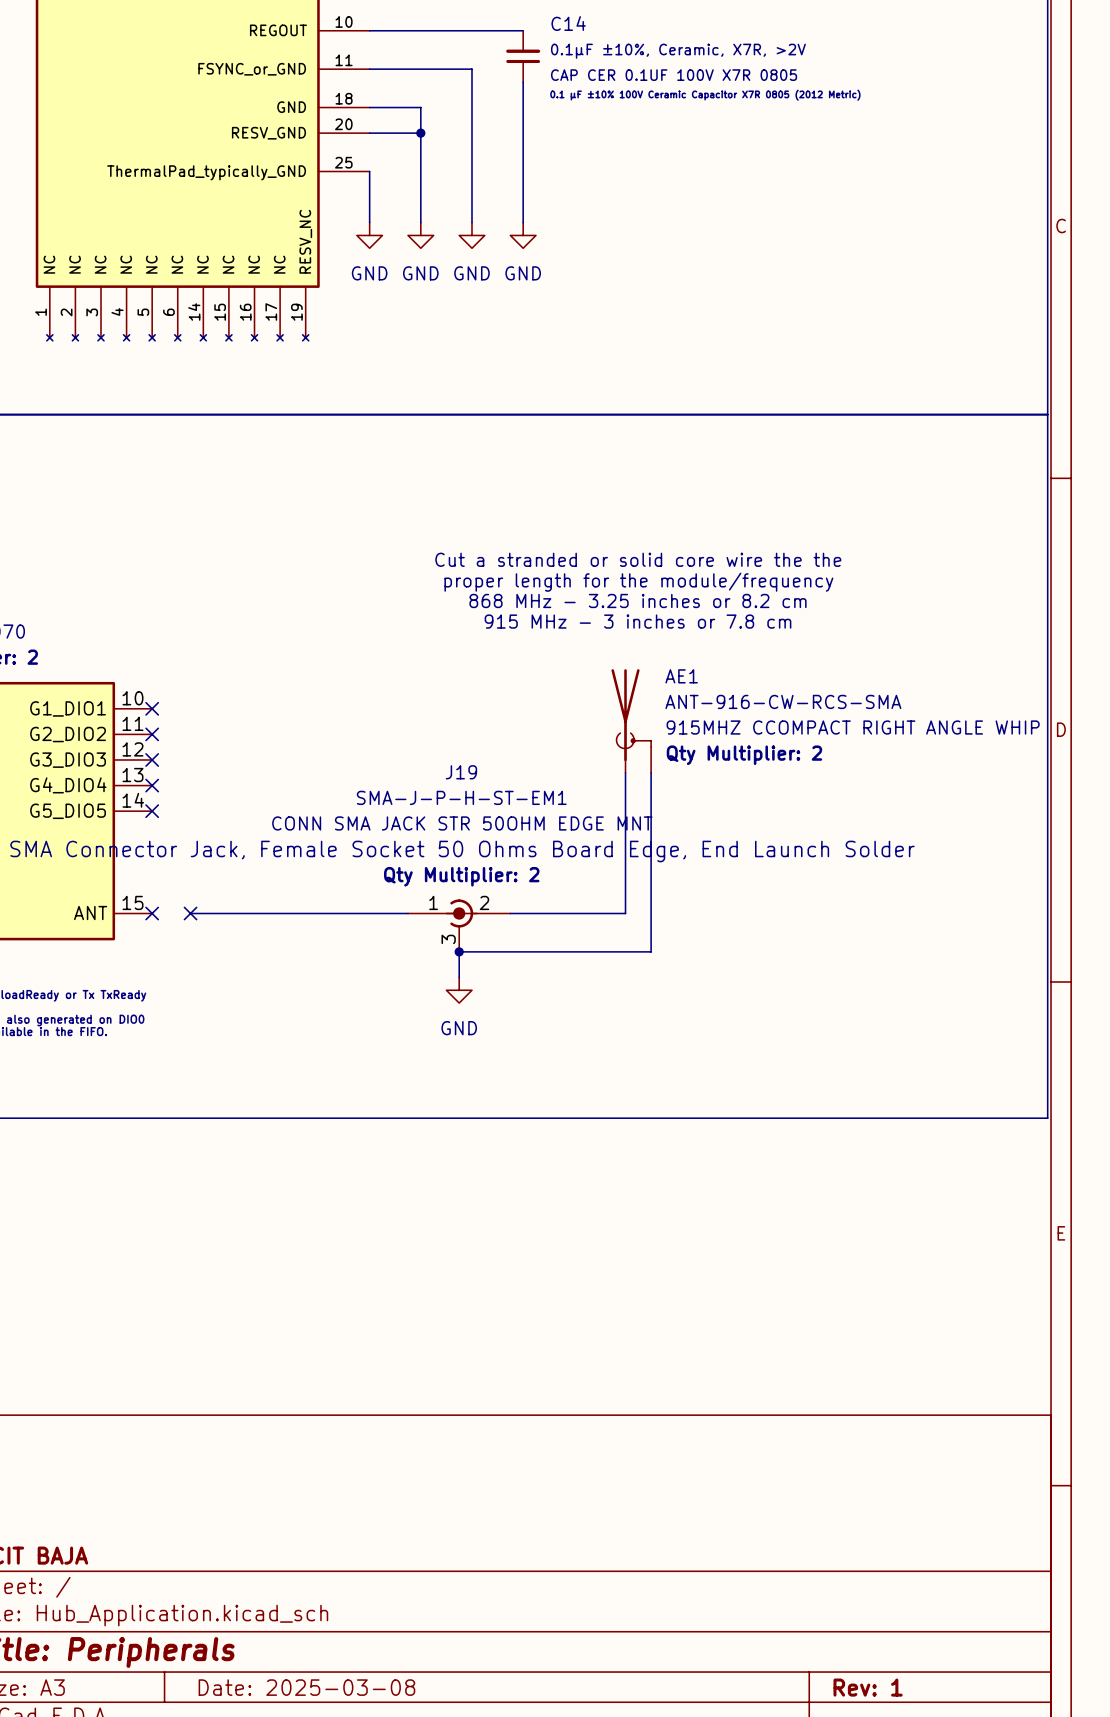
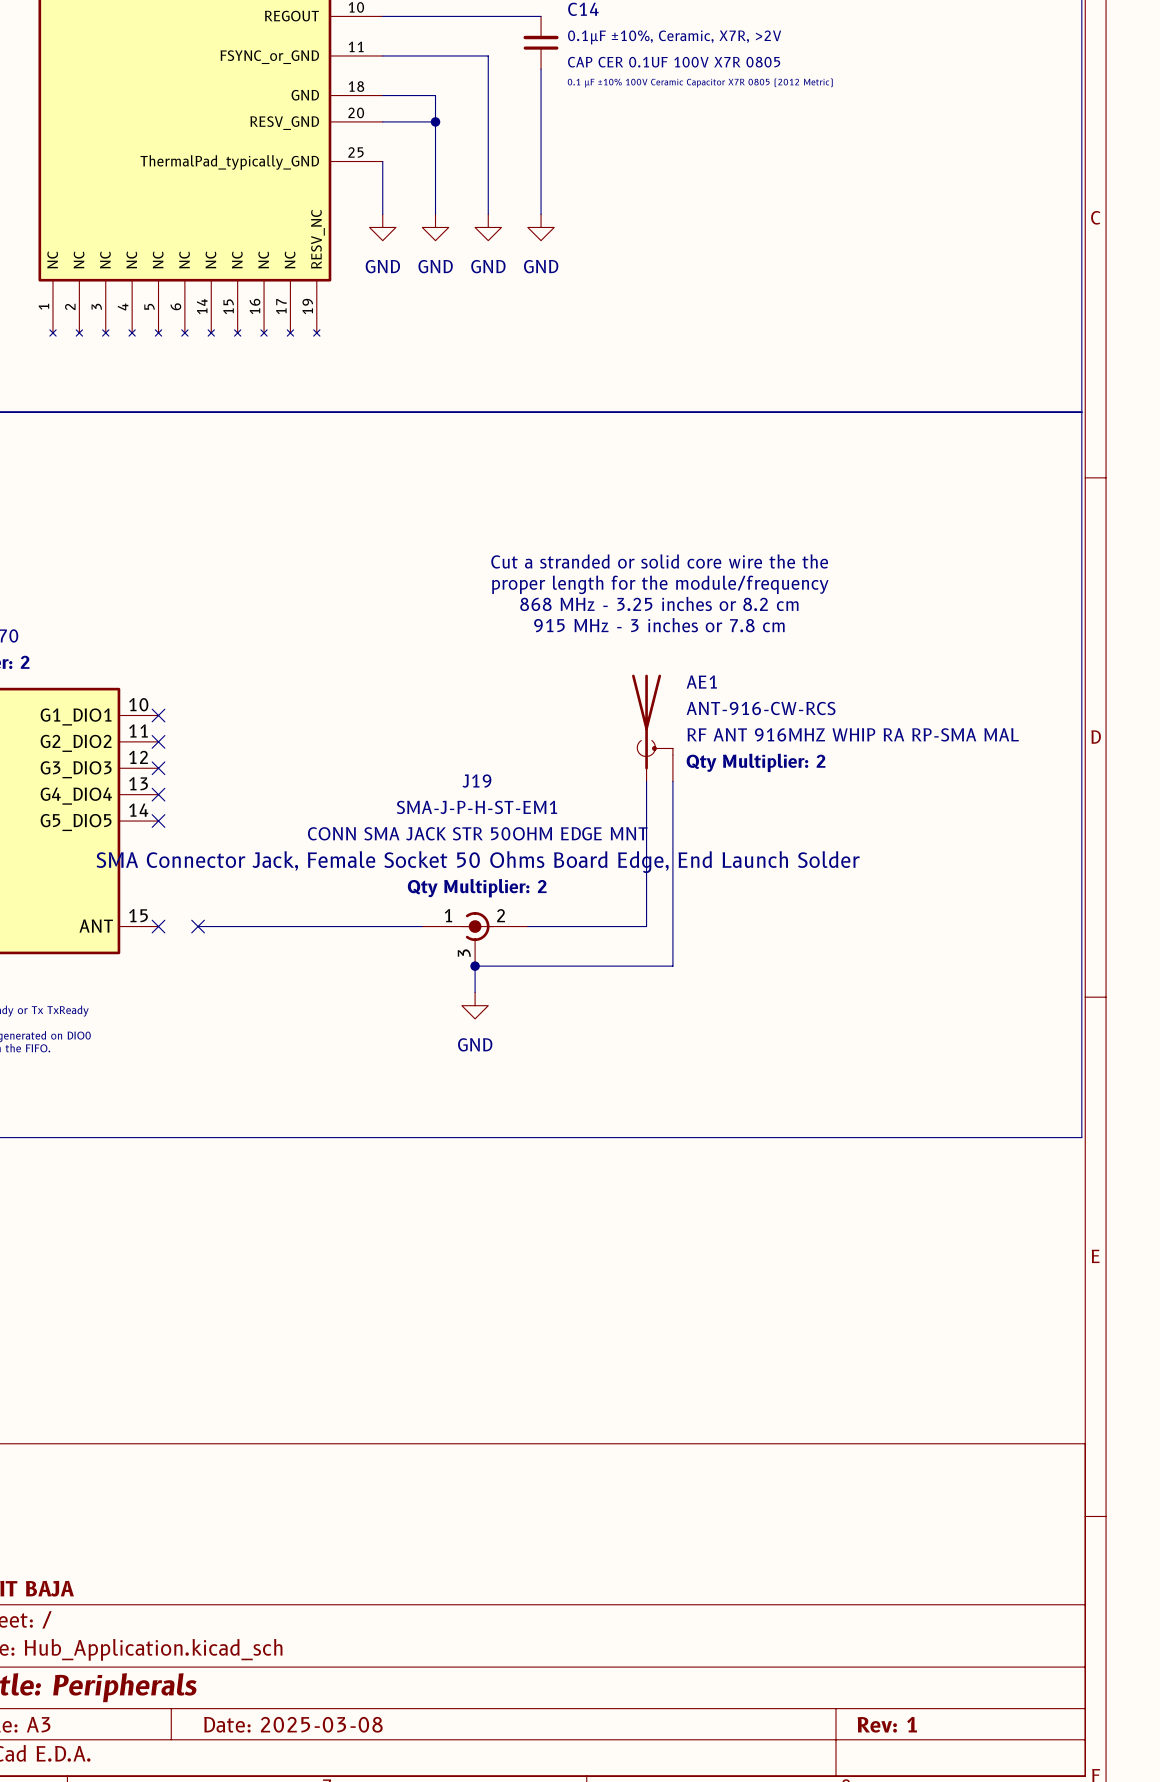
AE1 value: ANT-916-CW-RCS-SMA (783, 701) -> ANT-916-CW-RCS (761, 708)
AE1 text: 915MHZ CCOMPACT RIGHT ANGLE WHIP (853, 727) -> RF ANT 916MHZ WHIP RA RP-SMA MAL (853, 734)

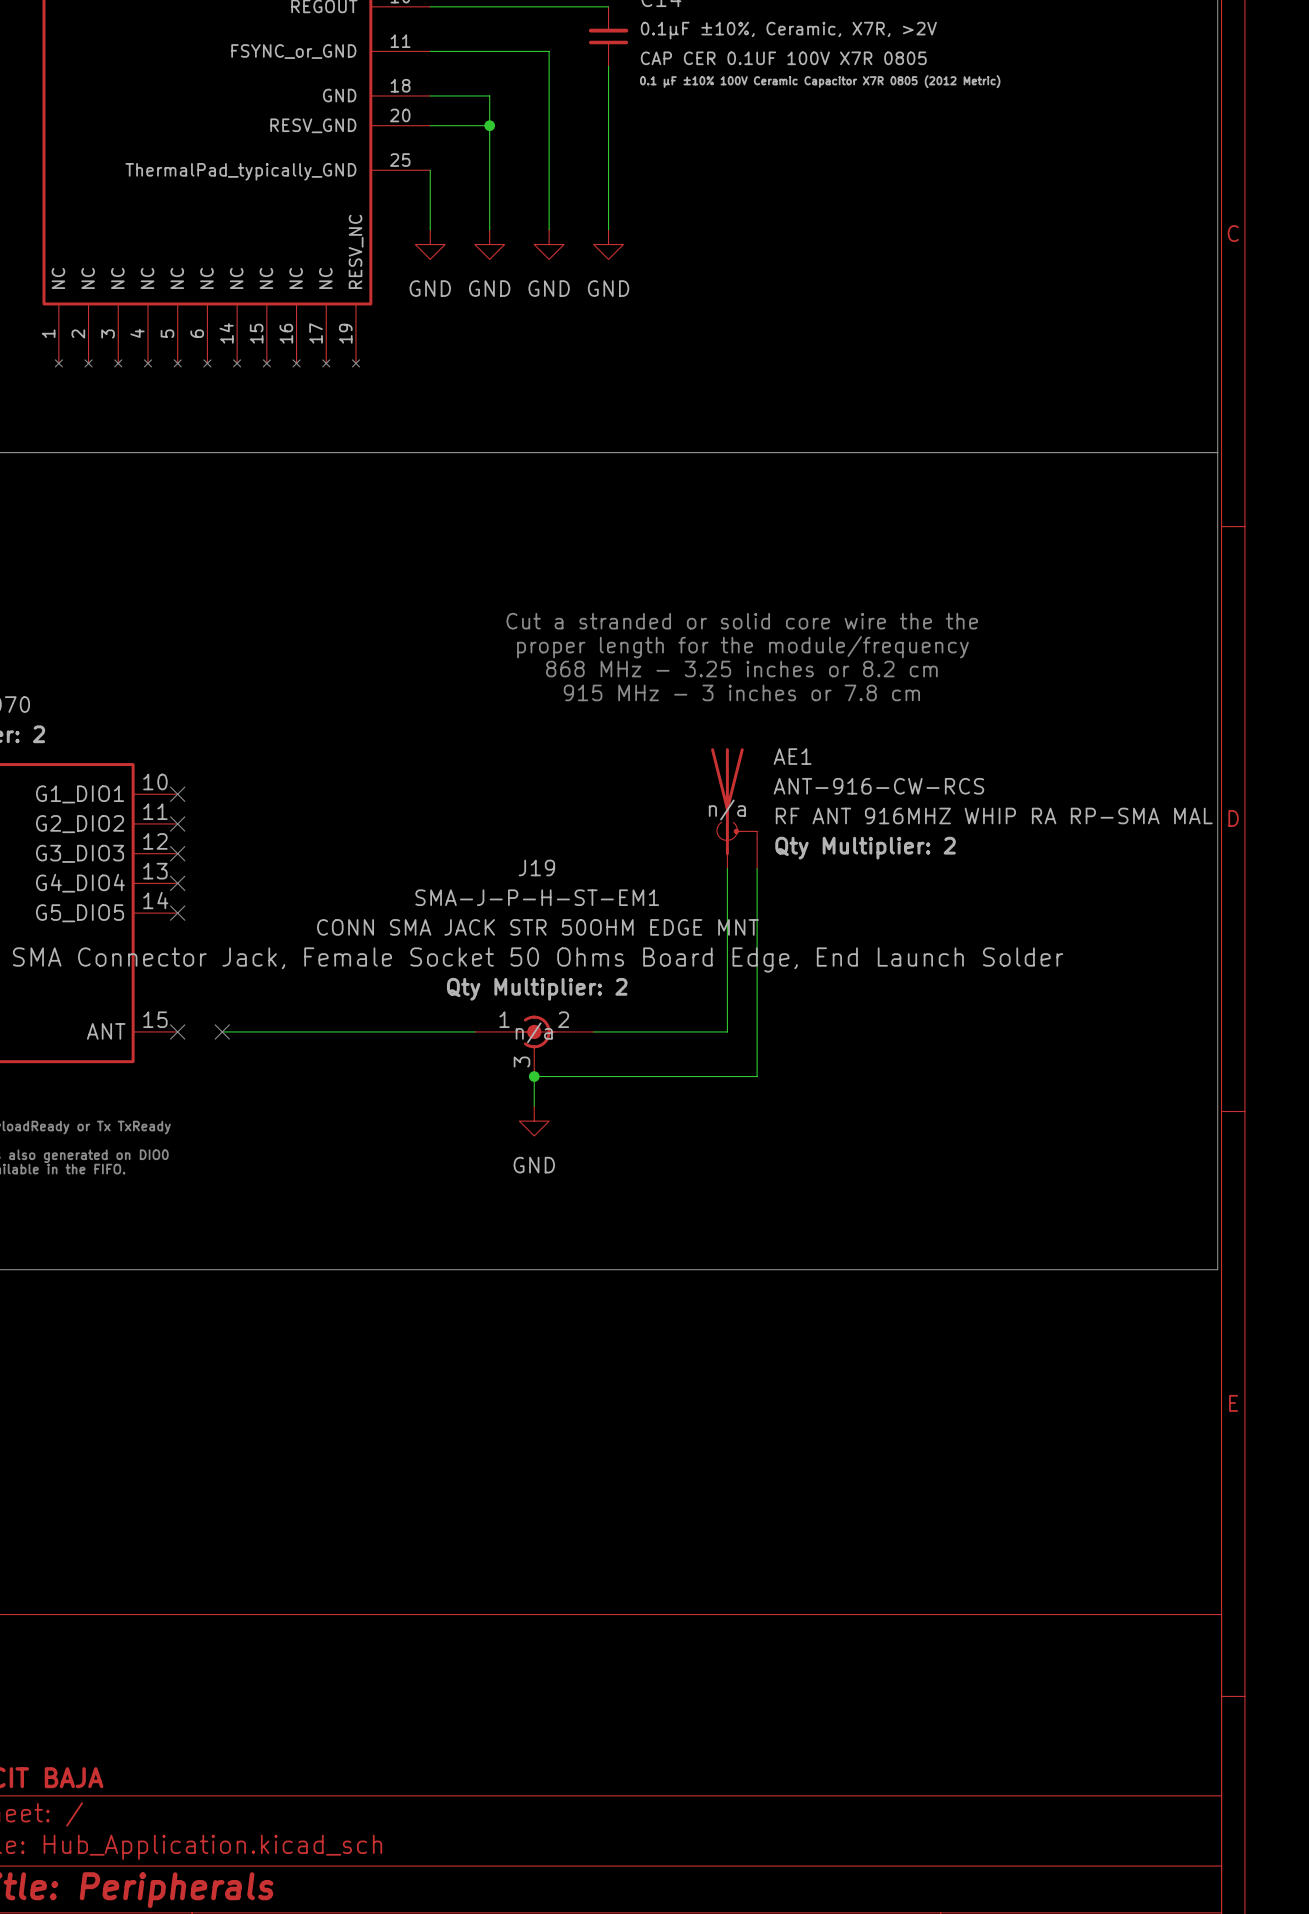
AE1 text: none -> n/a (727, 809)
J19 text: none -> n/a (534, 1032)

